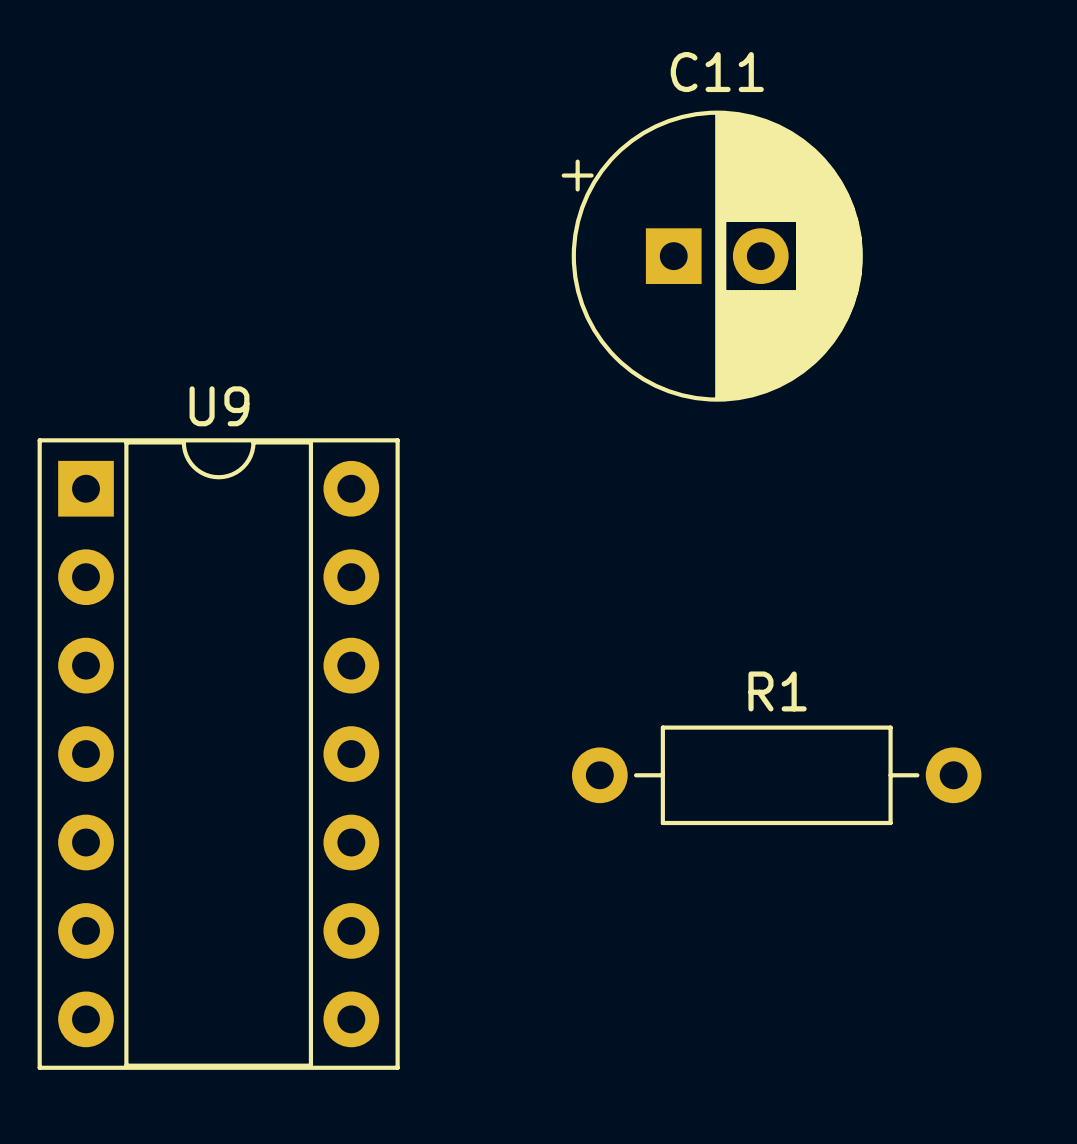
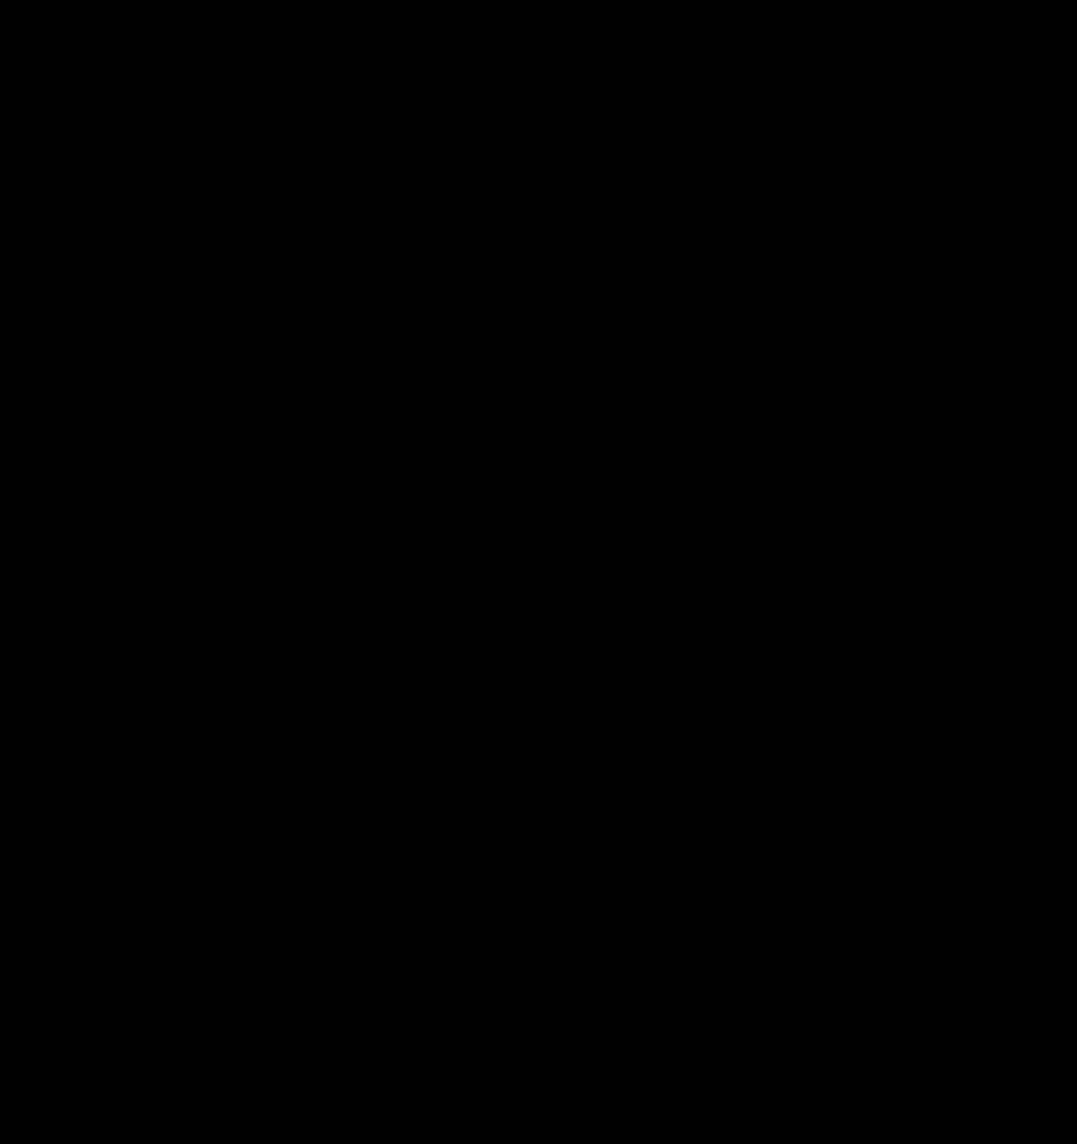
C11: (712, 256) -> none
U9: (218, 754) -> none
R1: (776, 775) -> none

